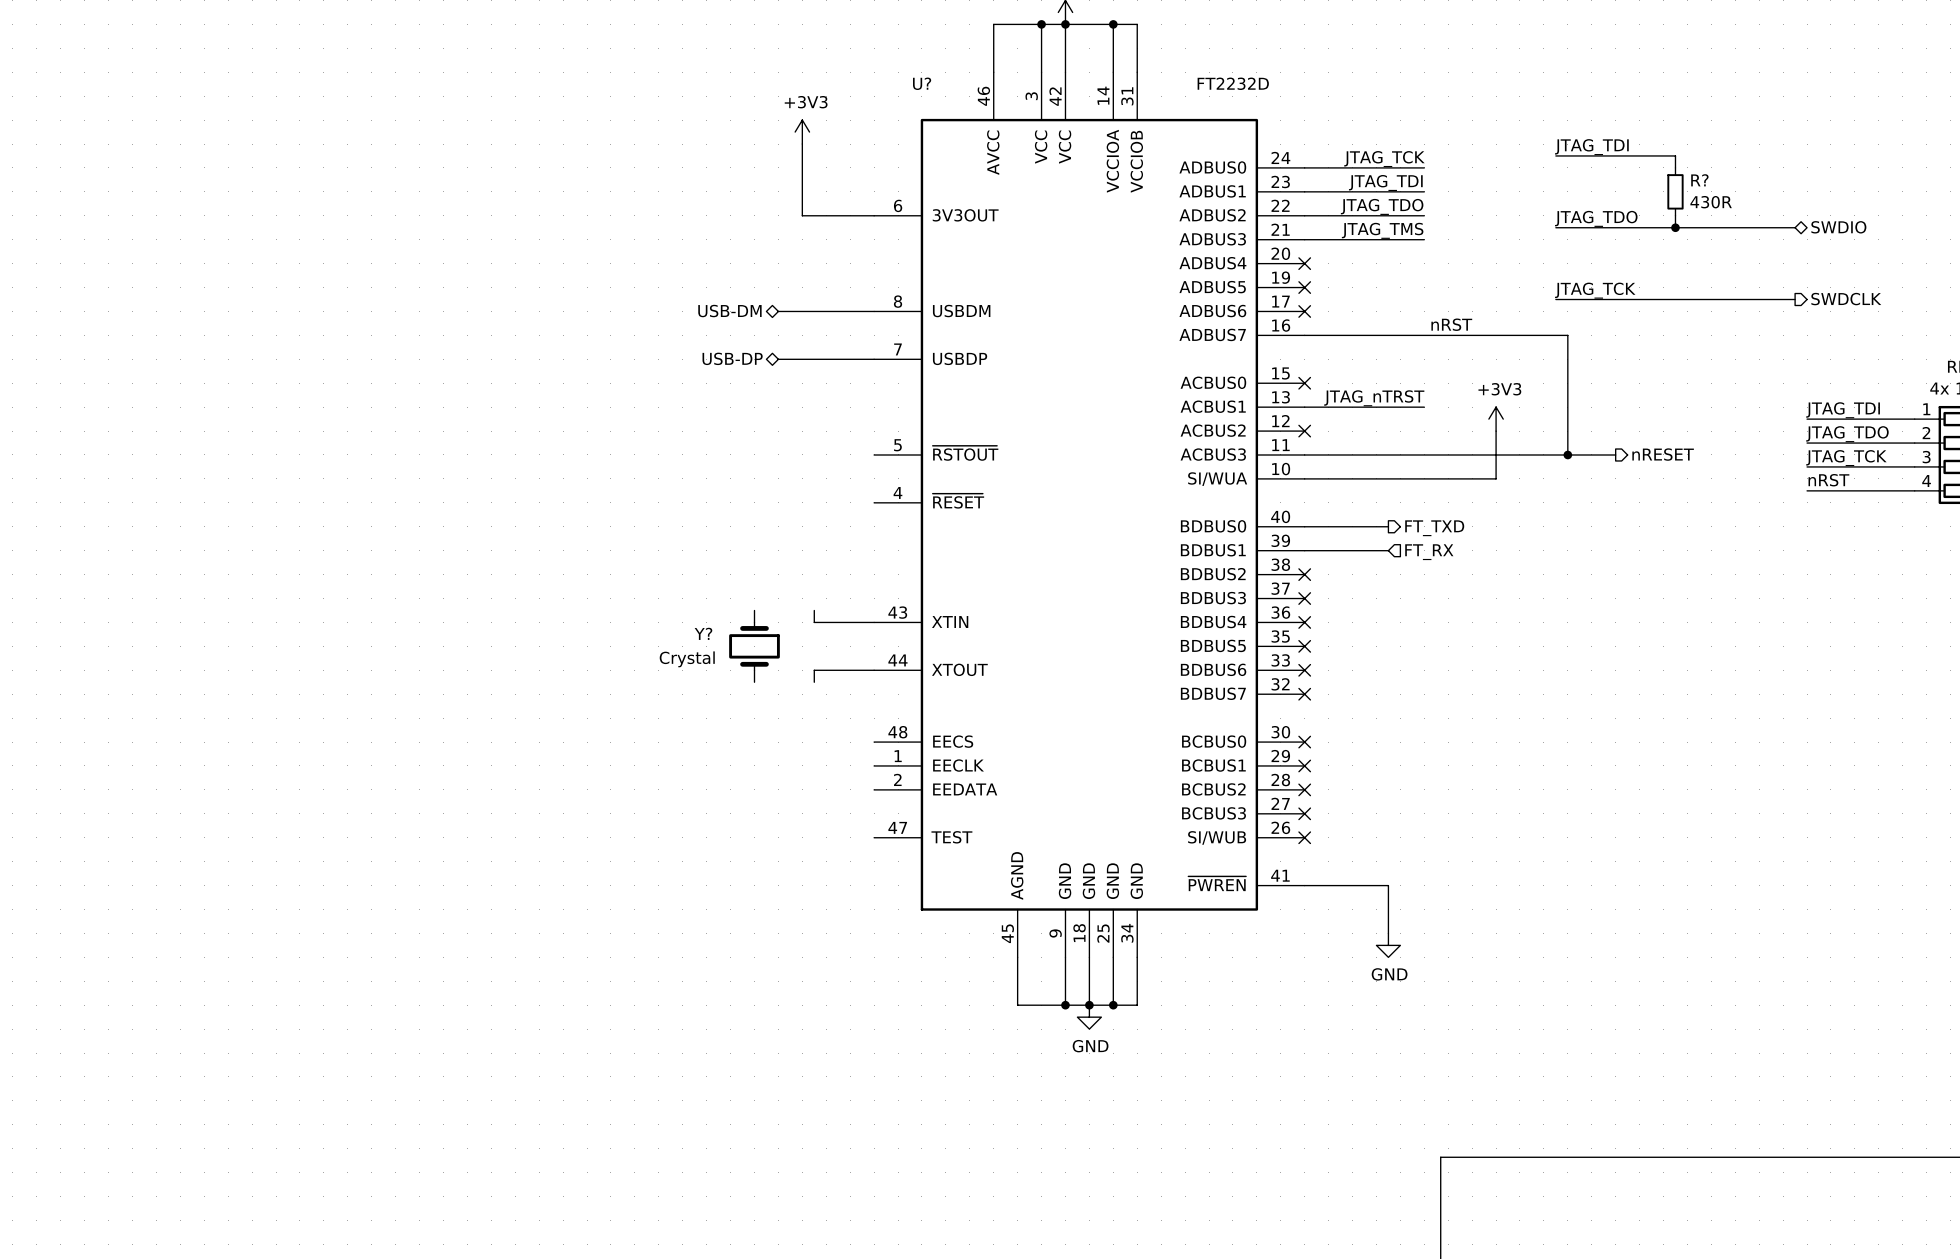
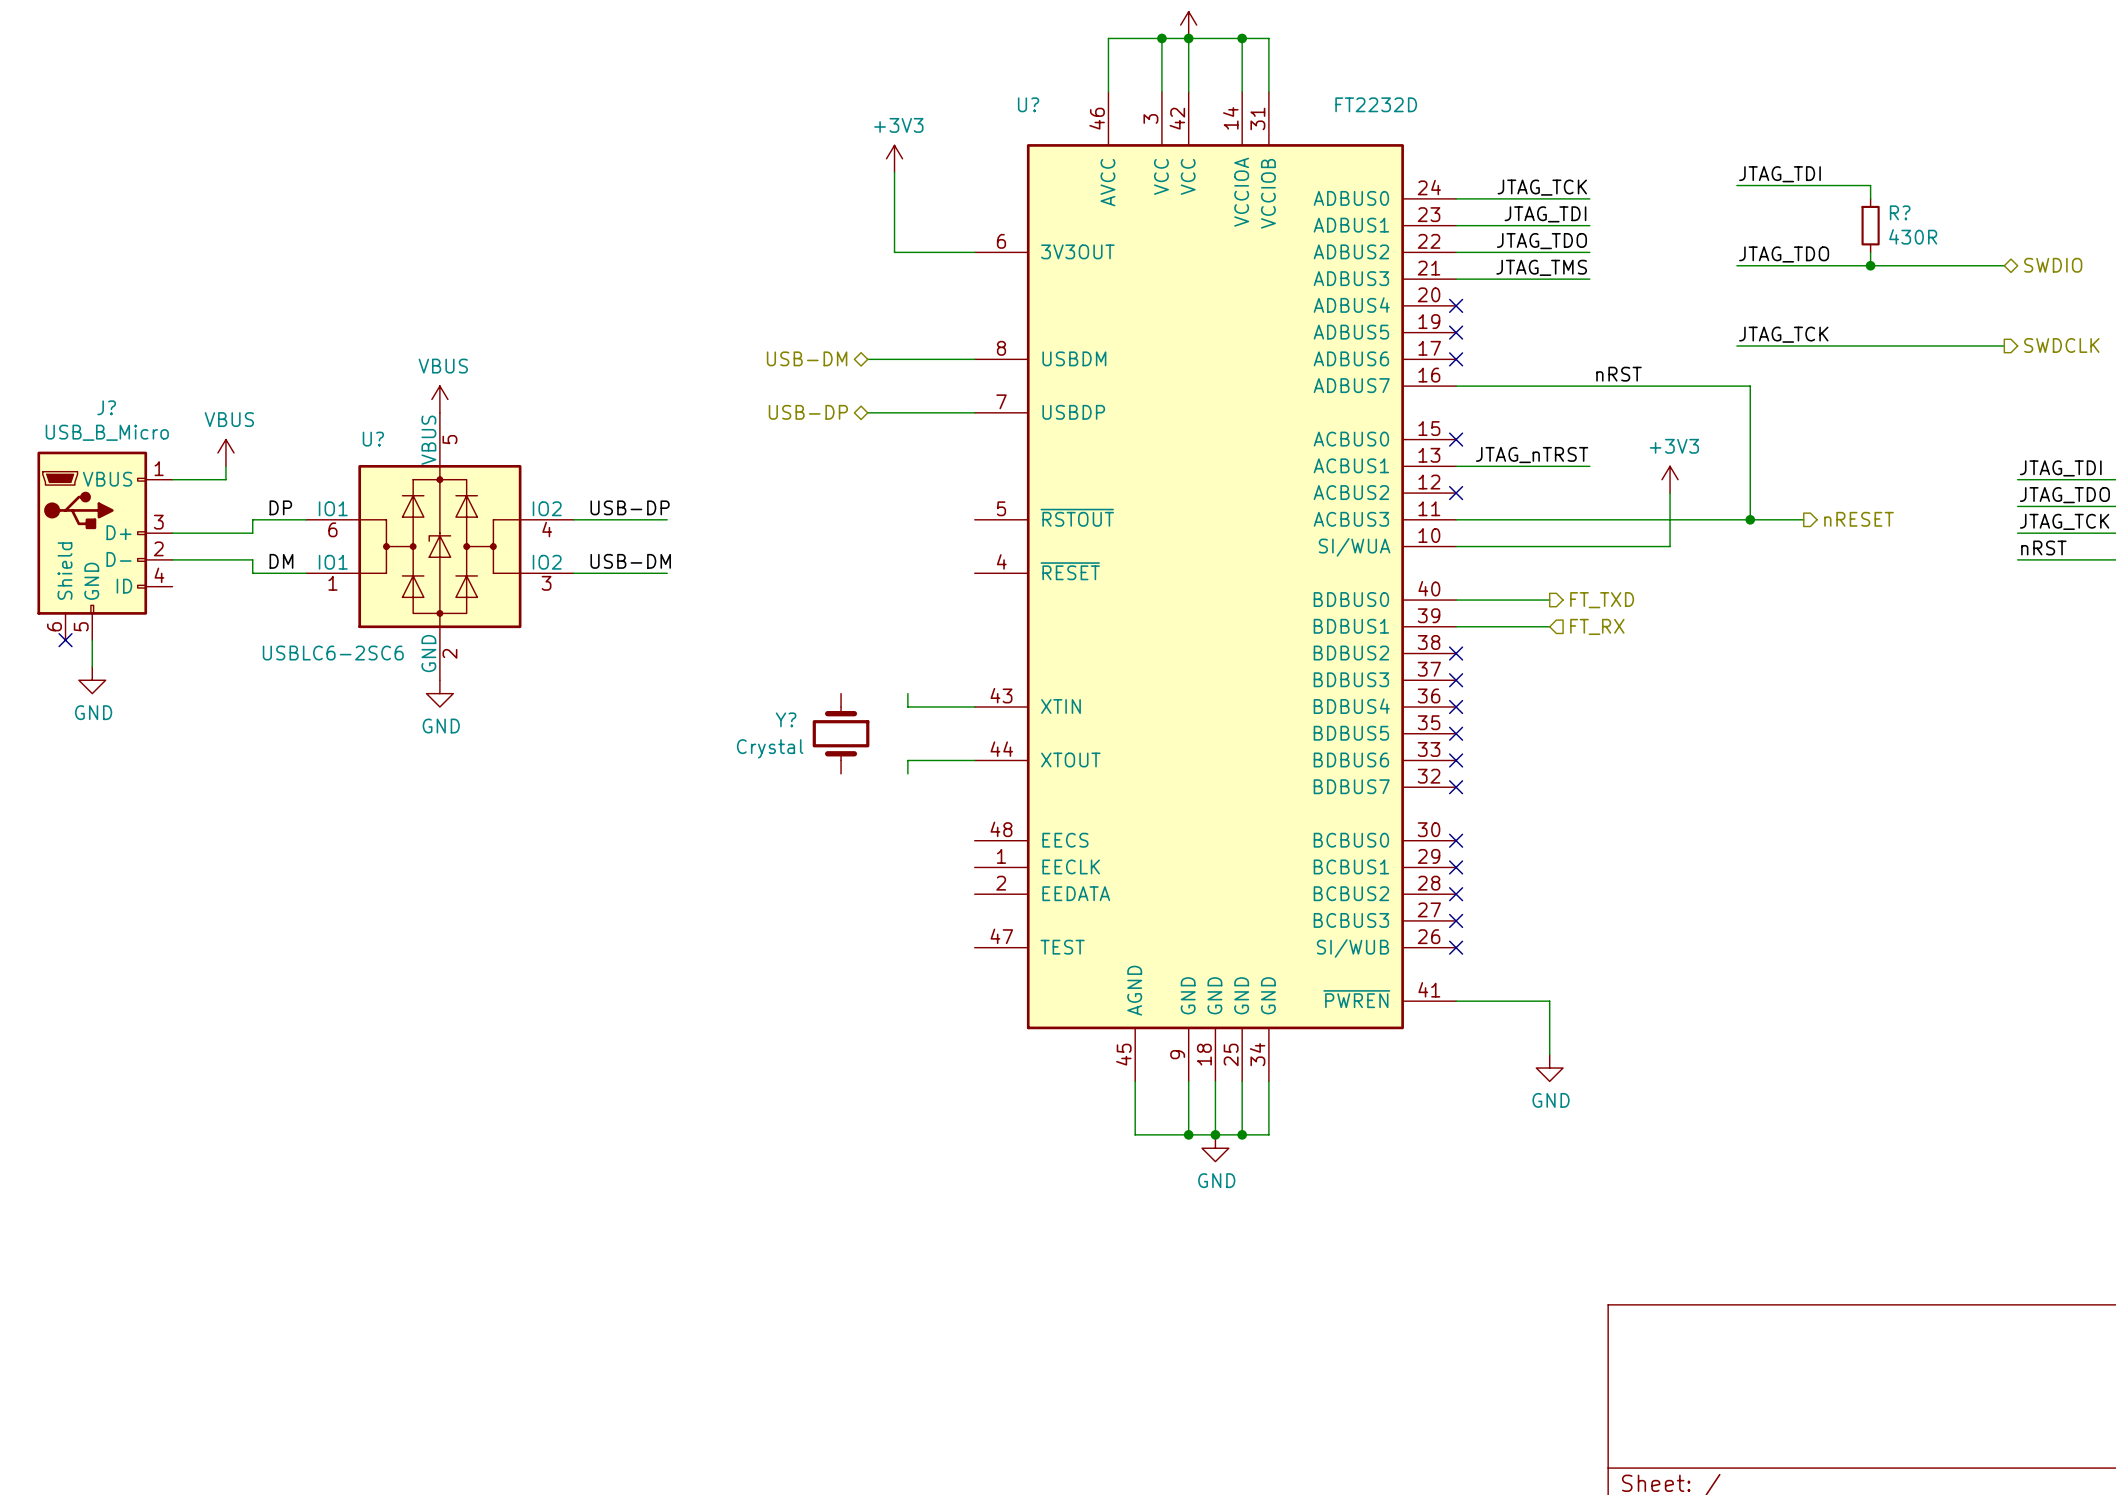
power symbol: none -> VBUS (439, 399)
power symbol: none -> VBUS (225, 452)
wire: none -> (225, 466) (225, 479) (172, 479)
label: none -> DP (280, 507)
label: none -> USB-DP (630, 507)
wire: none -> (306, 519) (252, 519) (252, 533) (172, 533)
wire: none -> (573, 519) (667, 519)
J?: none -> USB_B_Micro (104, 545)
U?: none -> USBLC6-2SC6 (439, 546)
wire: none -> (172, 559) (252, 559) (252, 573) (306, 573)
label: none -> DM (281, 561)
label: none -> USB-DM (630, 561)
wire: none -> (573, 573) (667, 573)
no-connect mark: none -> (65, 640)
wire: none -> (92, 640) (92, 666)
power symbol: none -> GND (92, 680)
power symbol: none -> GND (439, 693)

